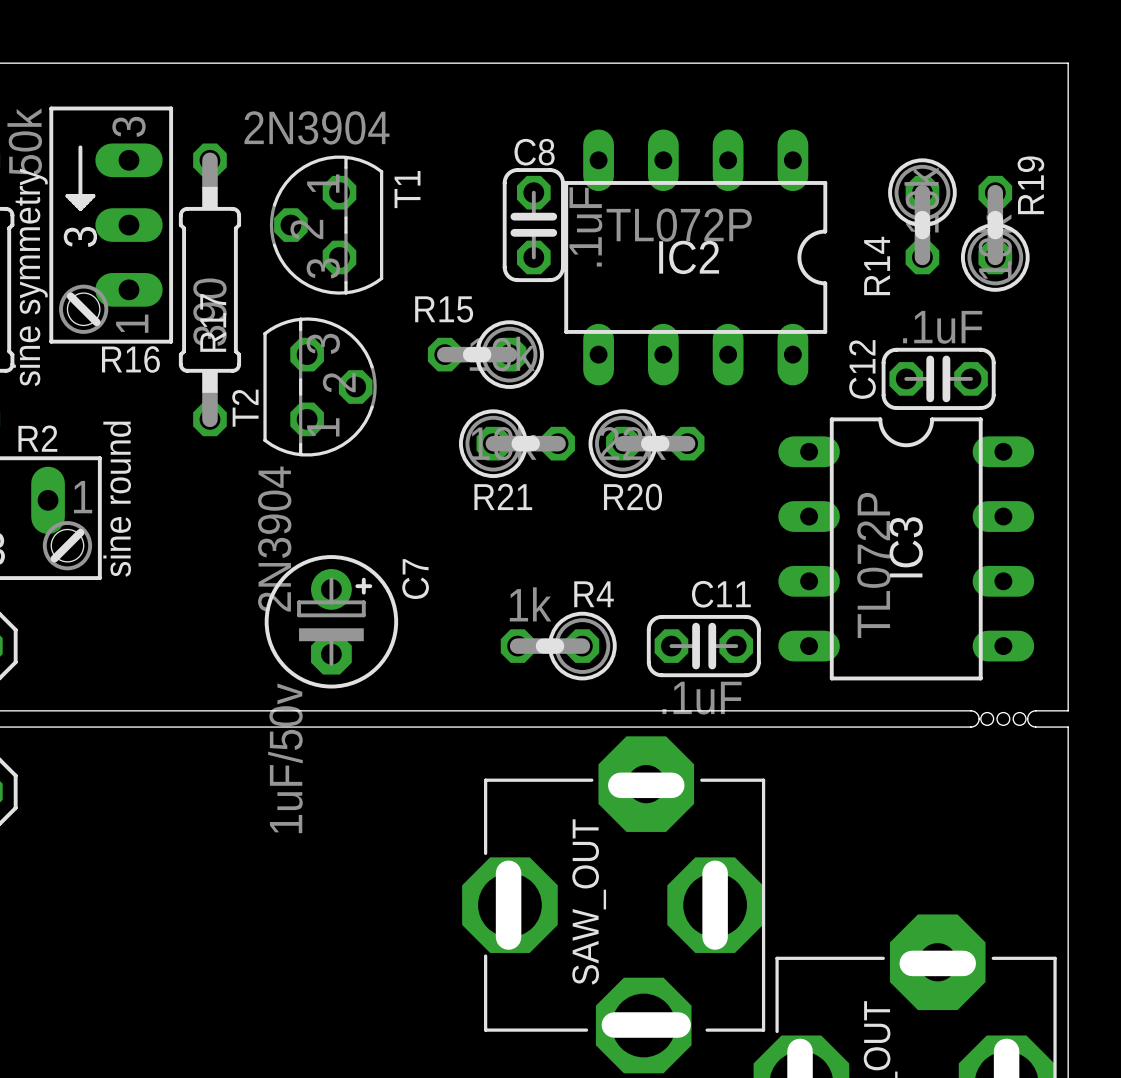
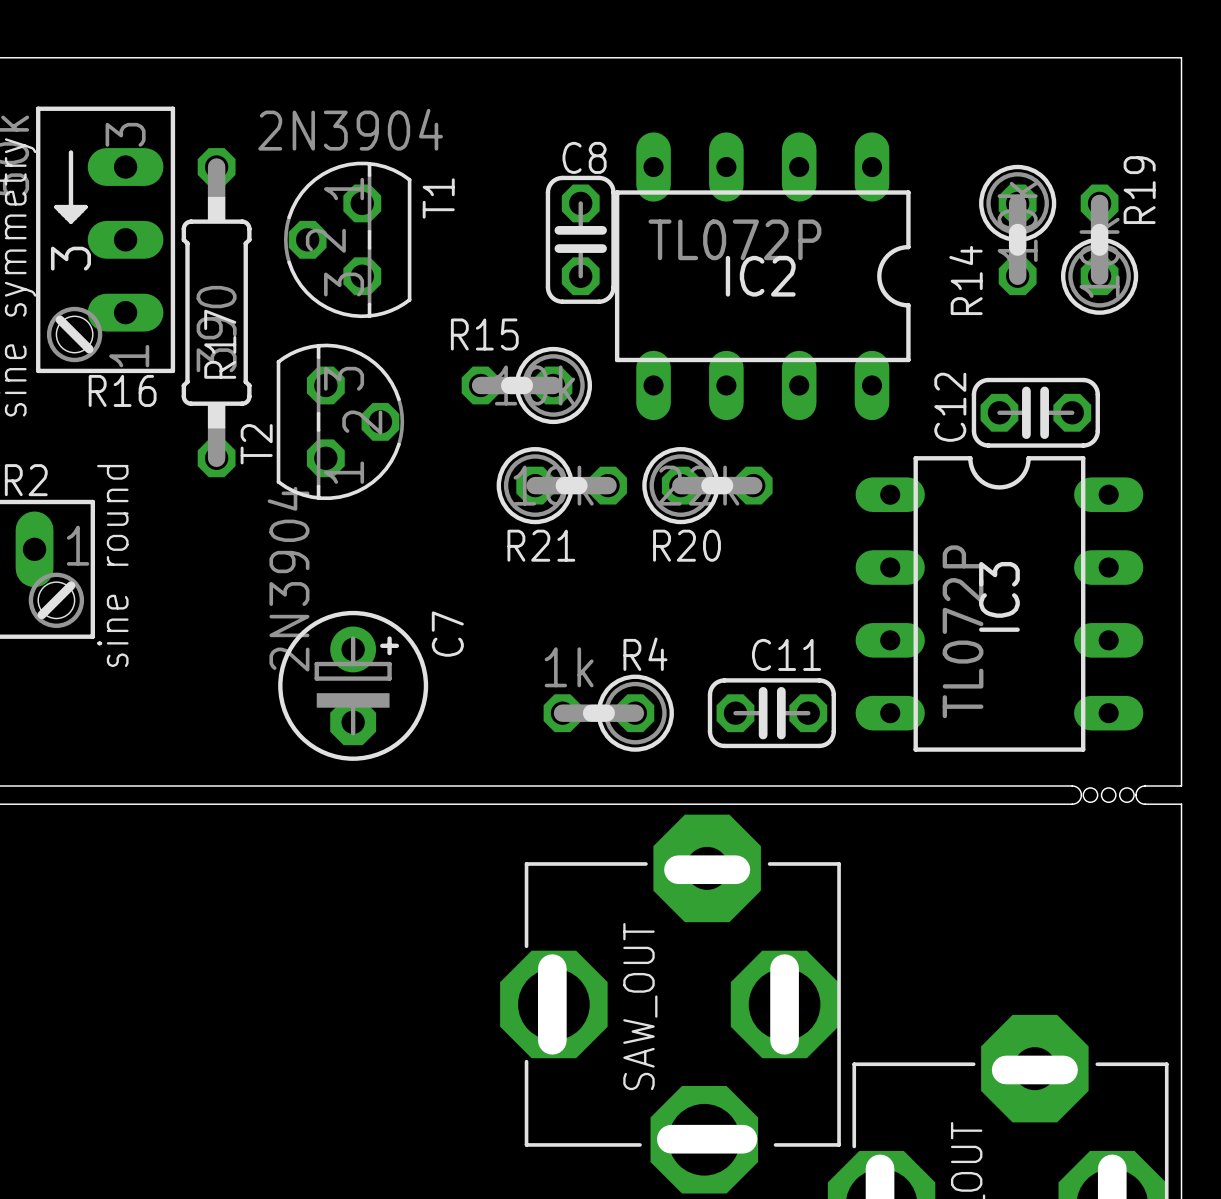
C8 value: .1uF (585, 226) -> none
C12 value: .1uF (942, 327) -> none
C11 value: .1uF (701, 698) -> none
C7 value: 1uF/50v (285, 758) -> none

